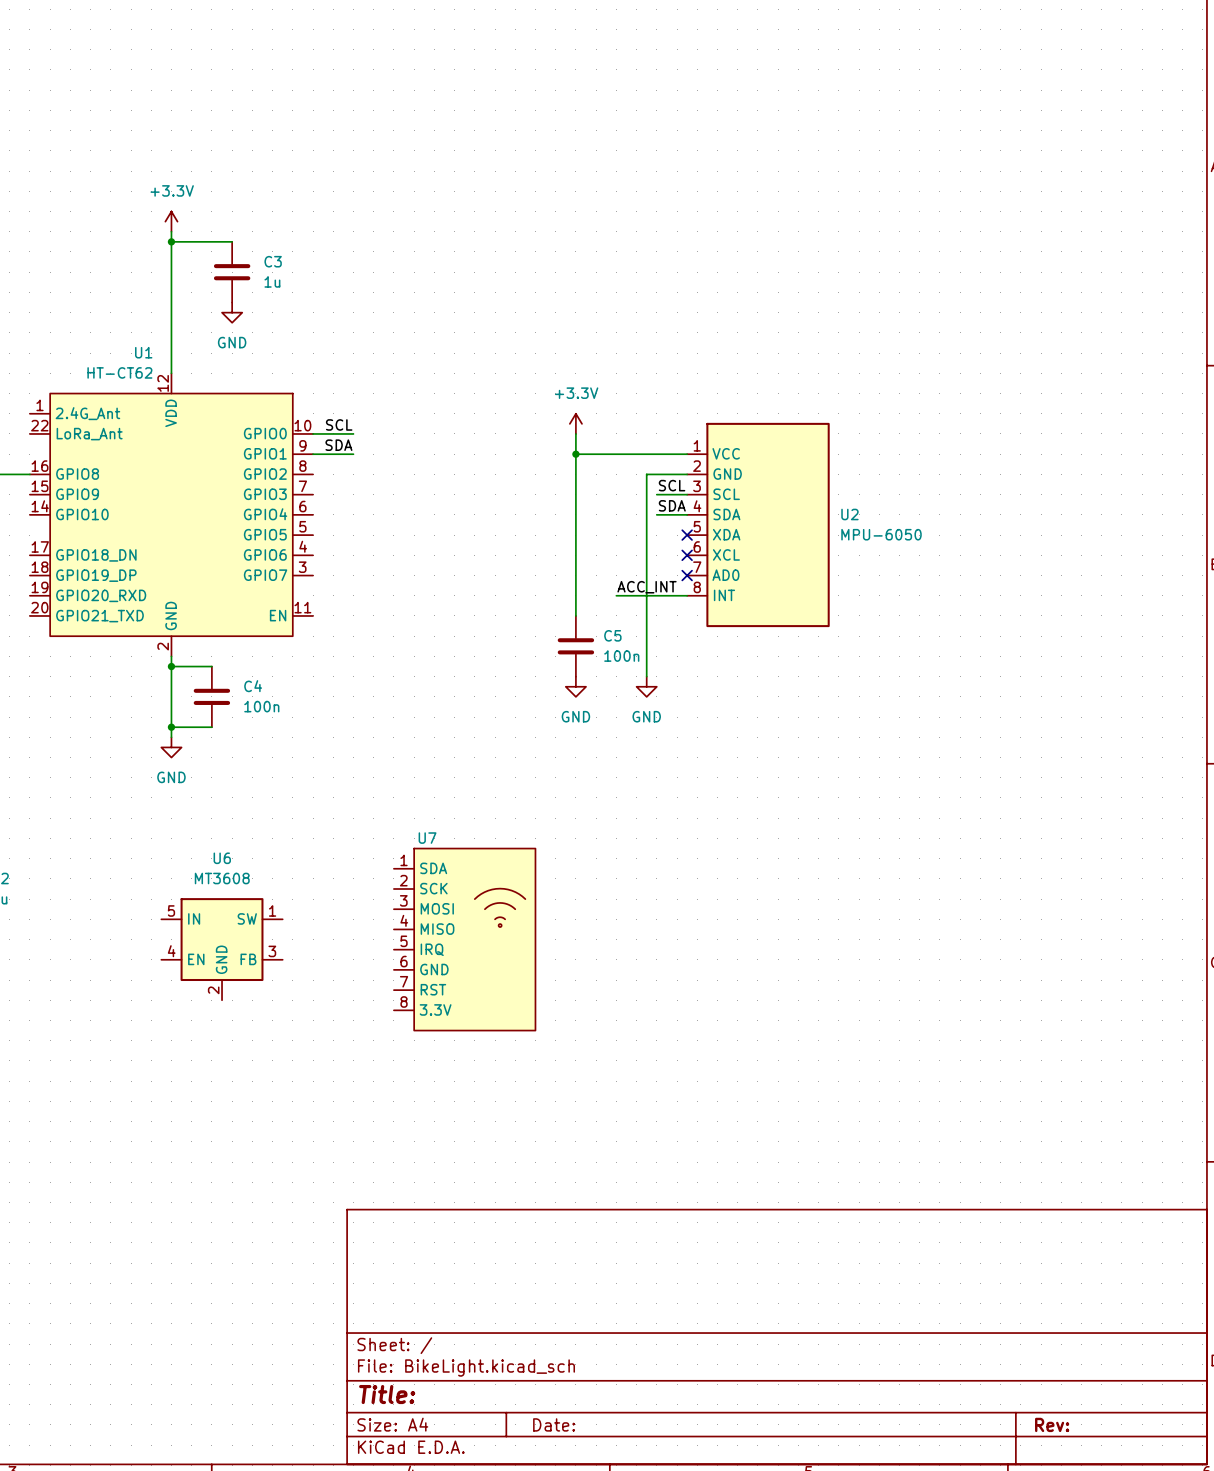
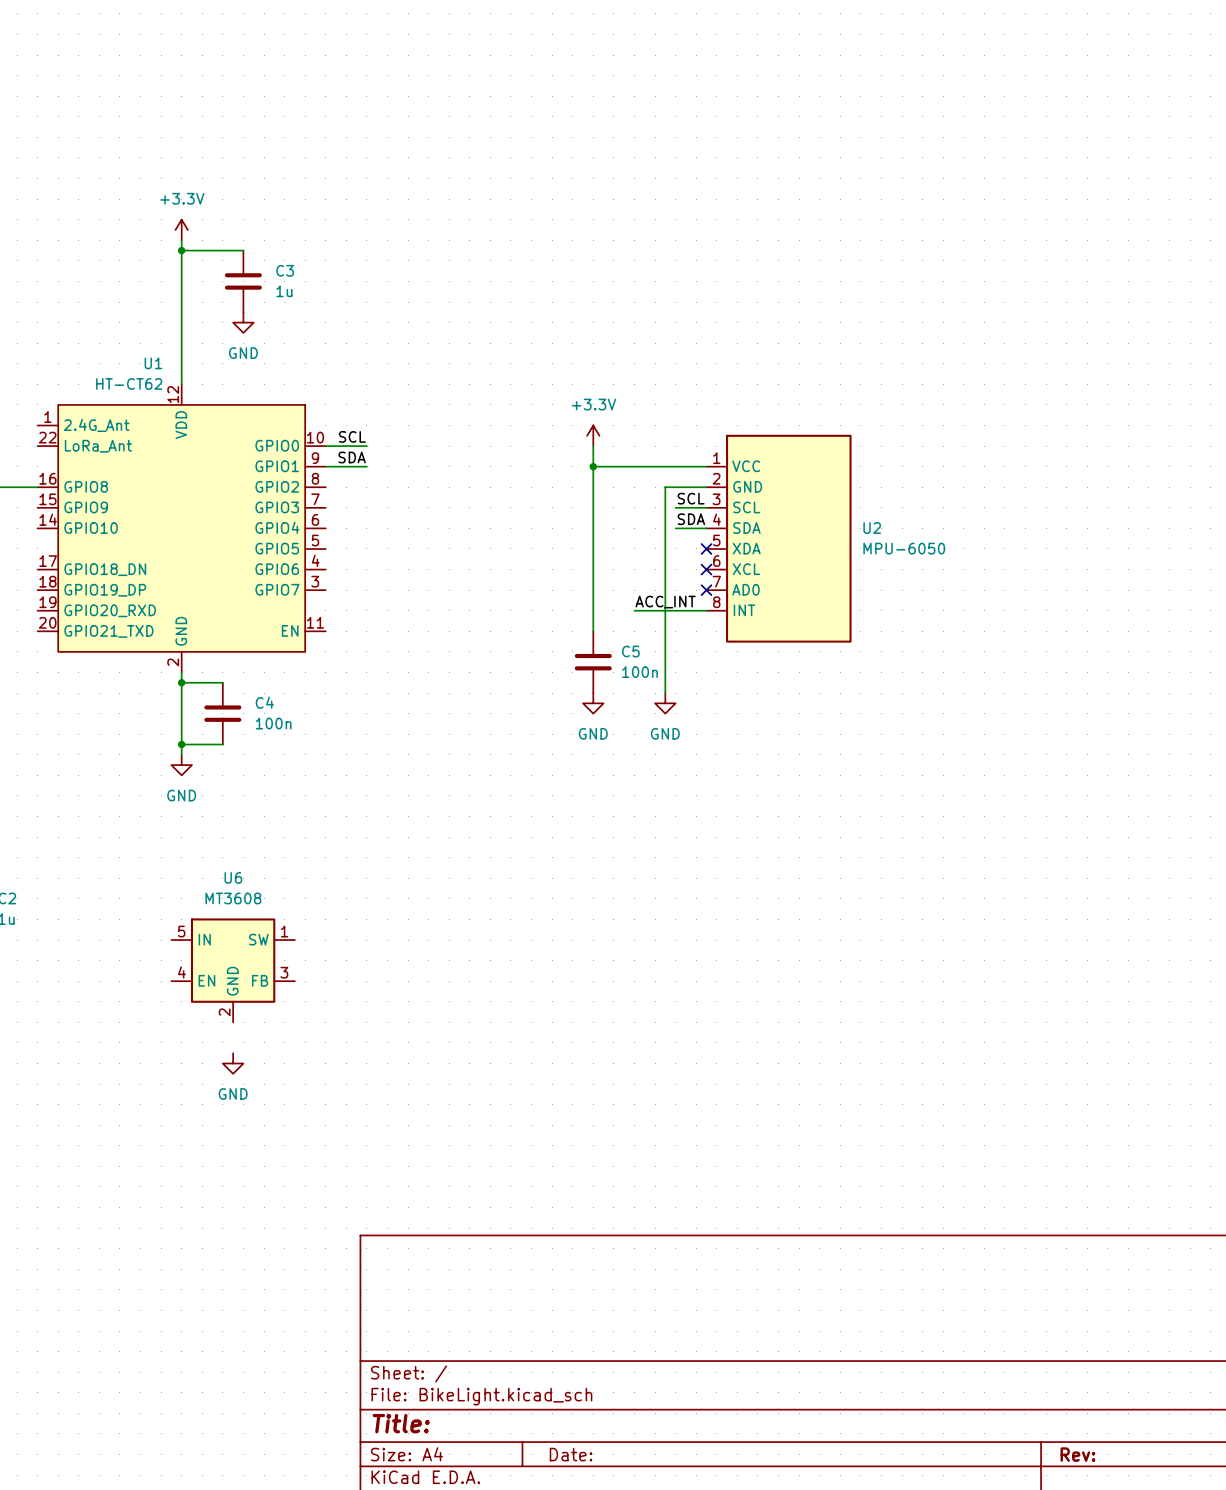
U7: (464, 939) -> none
power symbol: none -> GND (233, 1063)

